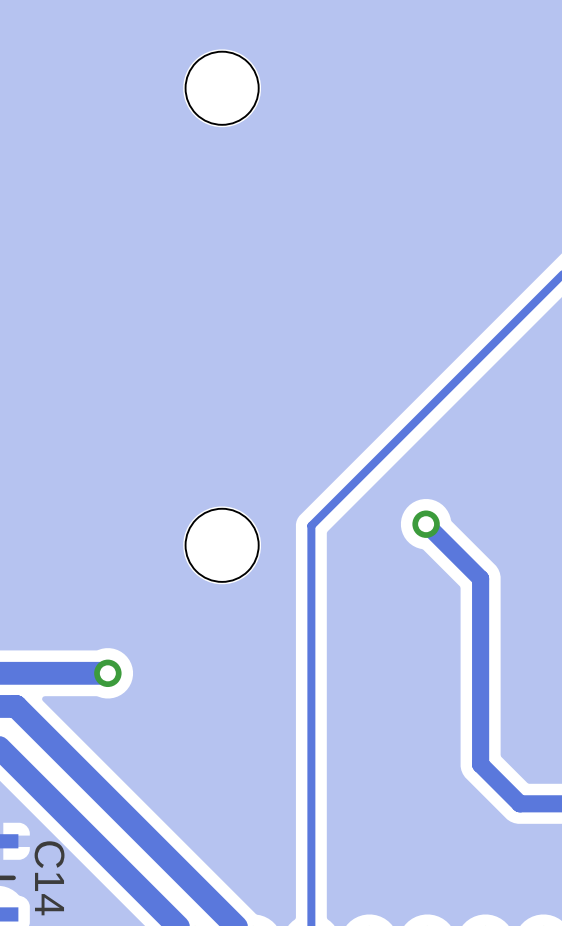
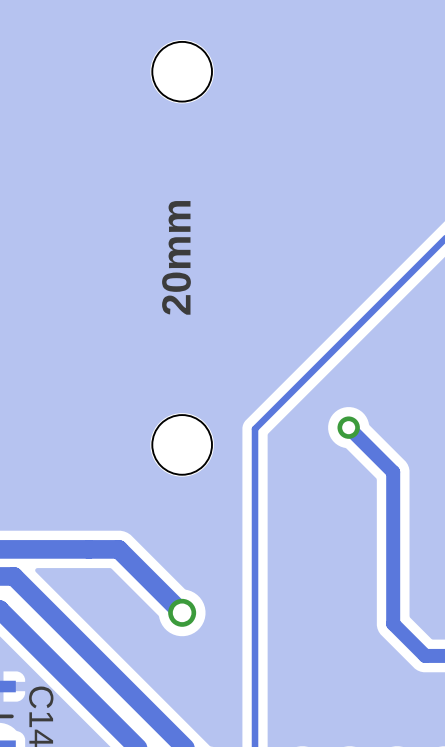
text: none -> 20mm (176, 257)
track: none -> (88, 549) (118, 549) (182, 612)
via: (107, 673) -> none
via: none -> (182, 612)

